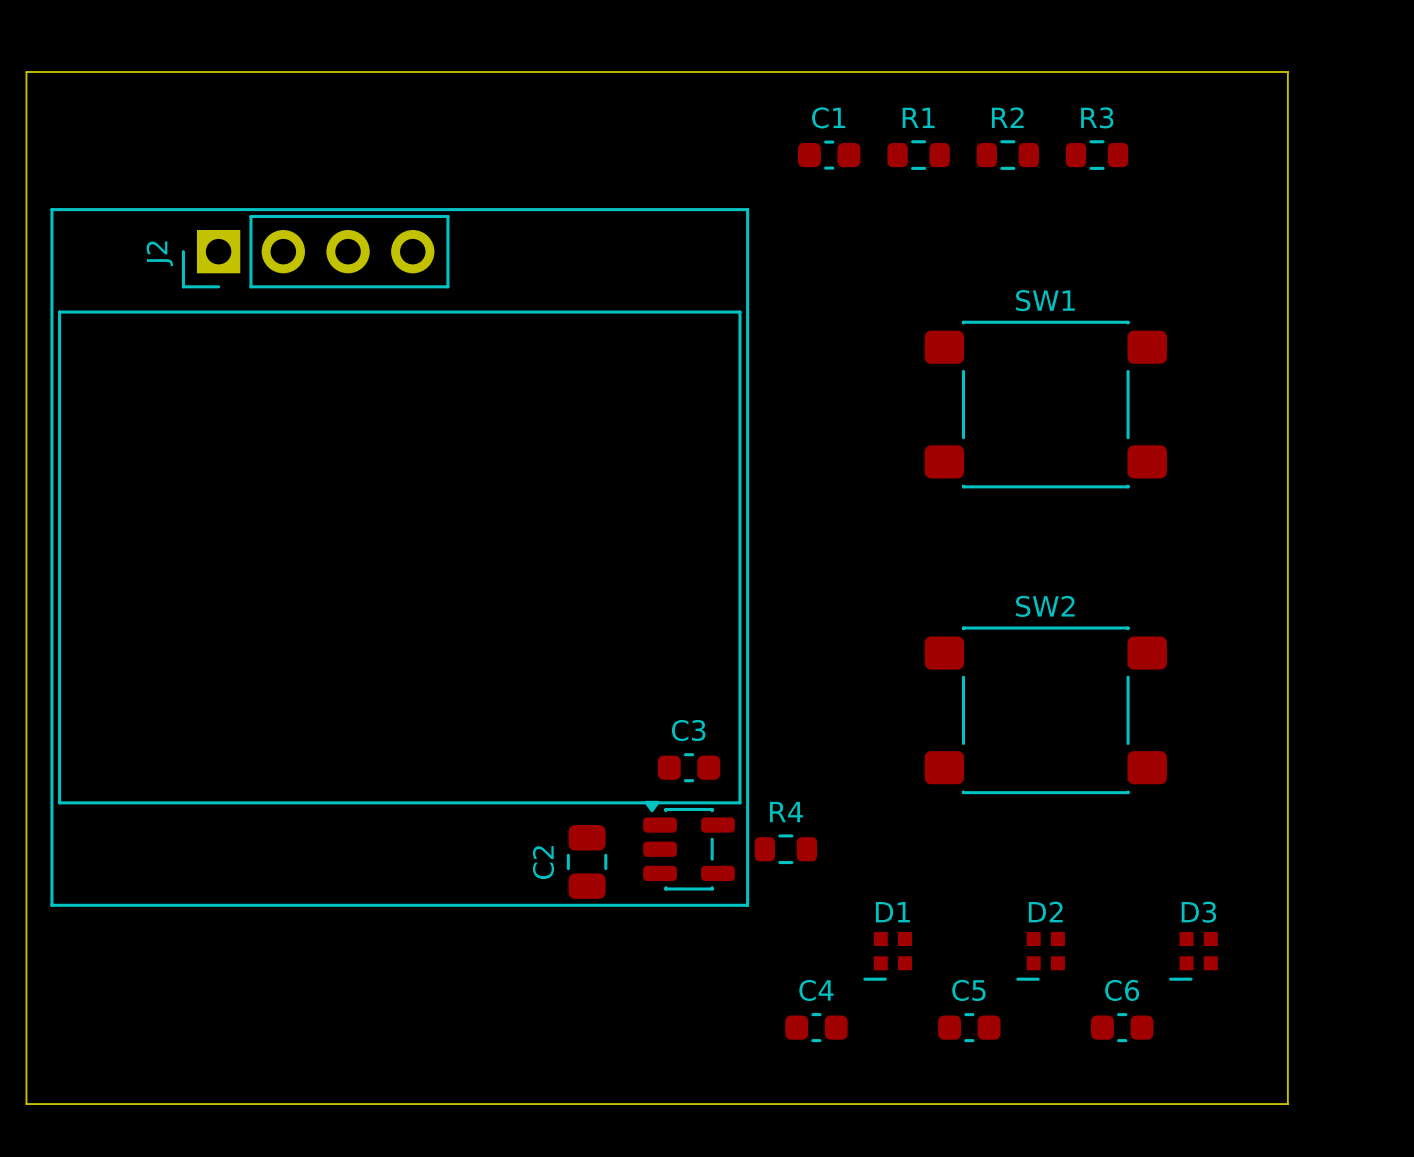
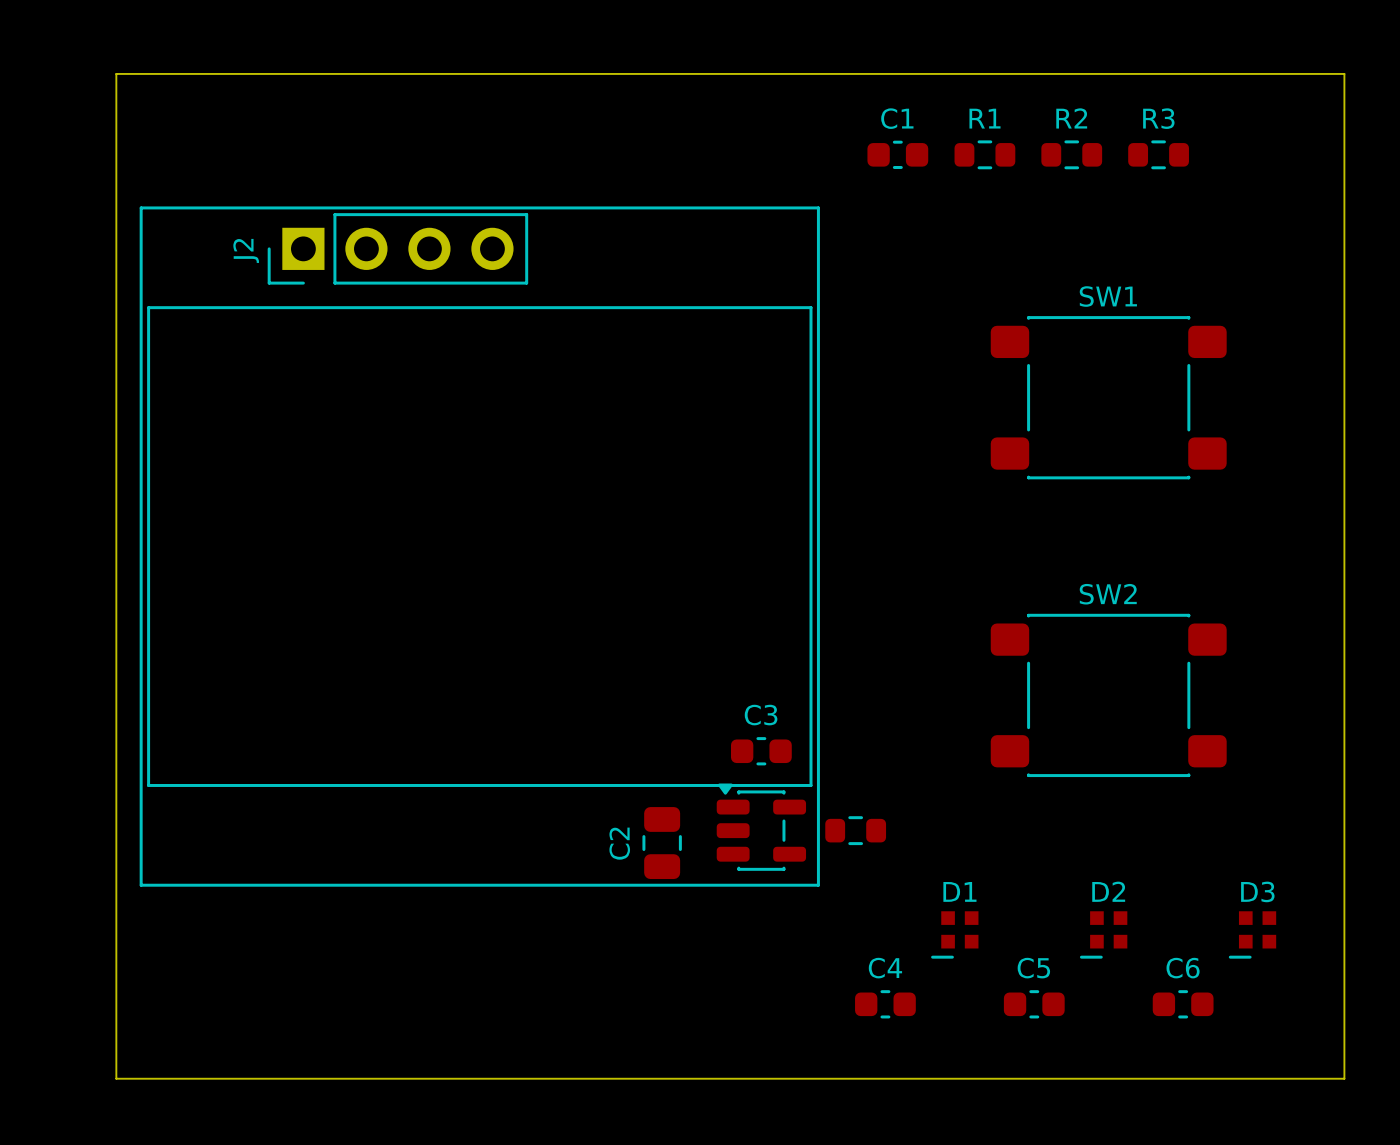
R4 name: R4 (786, 812) -> none

